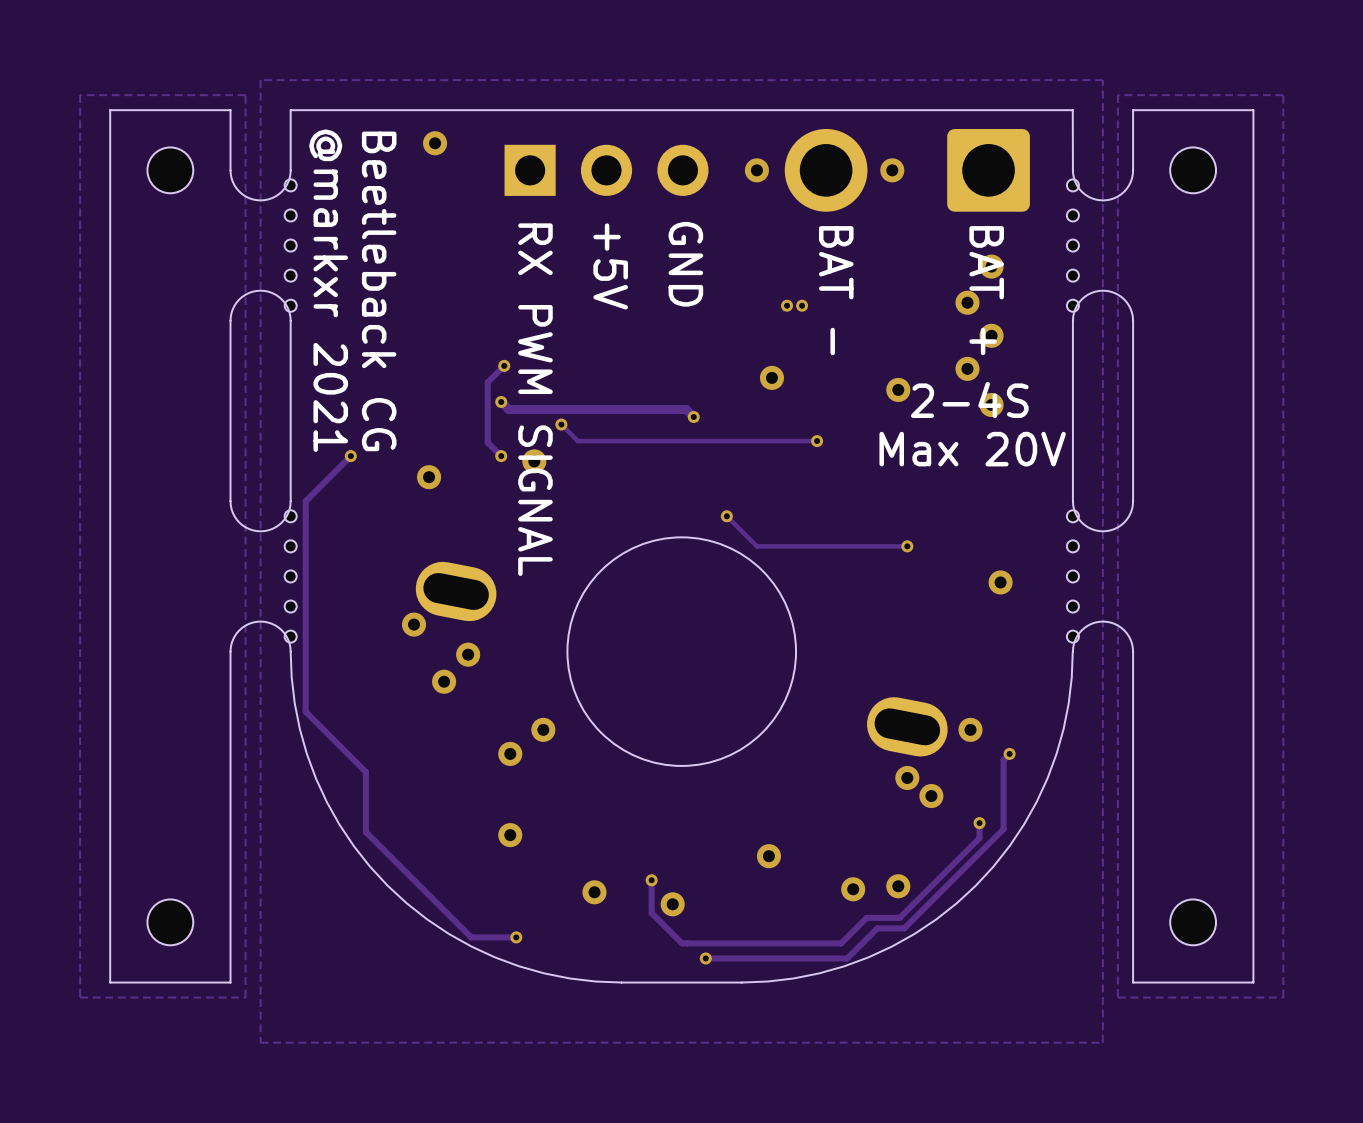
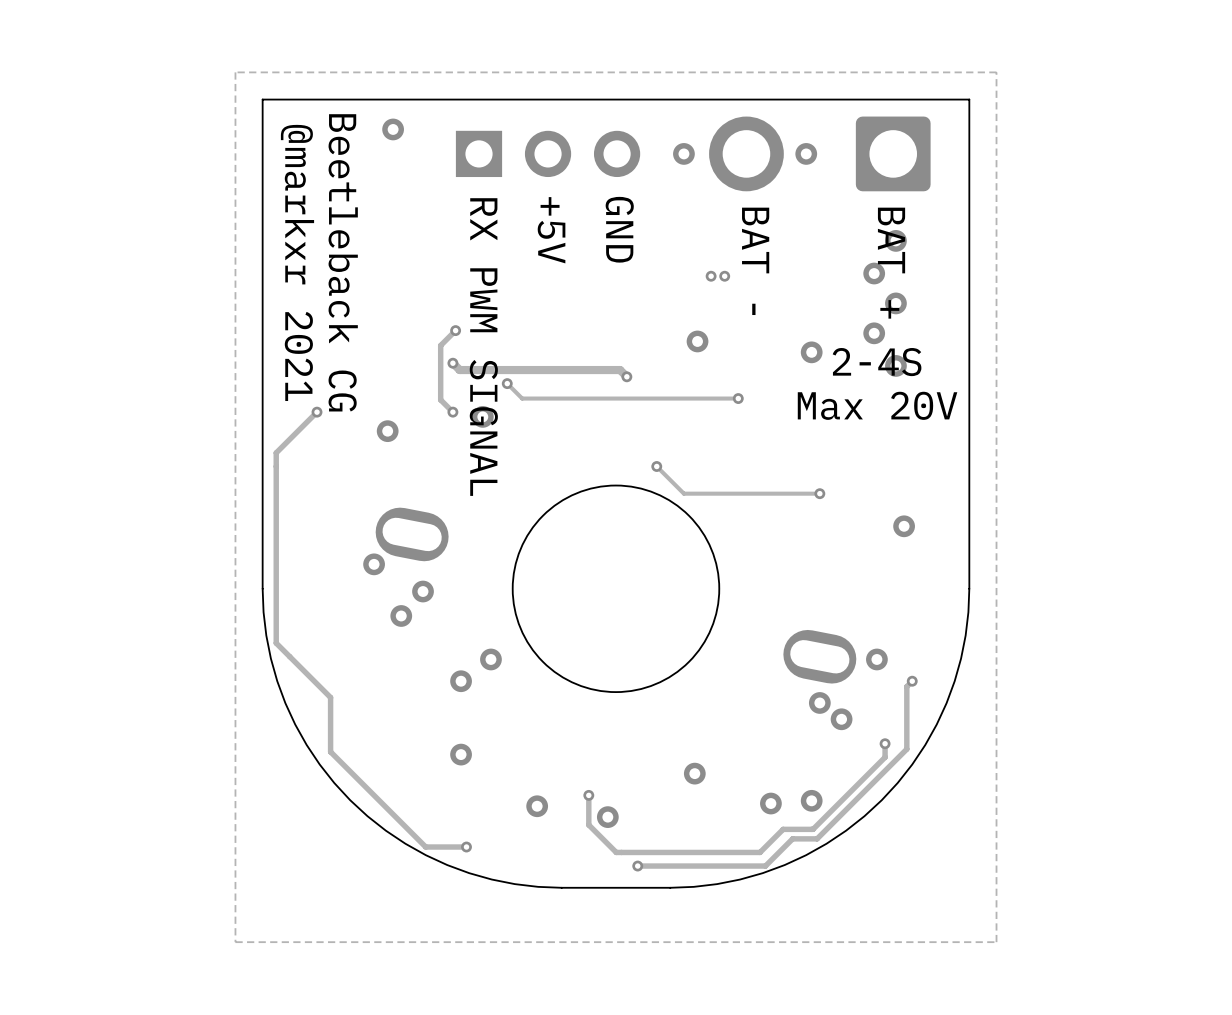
zone outline: (245, 95) (245, 997) (80, 997) (80, 95) (245, 95) -> none
zone outline: (1283, 95) (1117, 95) (1117, 997) (1283, 997) (1283, 95) -> none
board edge: (1072, 110) (1073, 178) (1079, 188) (1084, 194) (1091, 198) (1103, 200) (1114, 198) (1121, 194) (1126, 188) (1132, 178) (1133, 110) (1253, 110) (1253, 982) (1133, 982) (1132, 647) (1129, 636) (1121, 627) (1110, 622) (1099, 621) (1087, 625) (1081, 630) (1075, 640) (1072, 651) -> (969, 99) (969, 588)
part: (170, 170) -> none
board edge: (290, 170) (288, 181) (278, 194) (268, 199) (252, 199) (239, 191) (231, 178) (230, 110) (110, 110) (110, 982) (230, 982) (230, 647) (234, 636) (242, 627) (252, 622) (264, 621) (275, 625) (281, 630) (288, 640) (290, 651) -> (262, 153) (262, 289)
part: (1193, 170) -> none
part: (290, 245) -> none
part: (1072, 245) -> none
board edge: (290, 320) (288, 309) (281, 299) (272, 292) (260, 290) (249, 292) (239, 299) (232, 309) (230, 320) (231, 509) (236, 519) (242, 525) (252, 530) (264, 531) (275, 527) (281, 522) (288, 512) (290, 501) -> (262, 588) (262, 452)
board edge: (1133, 320) (1132, 505) (1129, 516) (1121, 525) (1110, 530) (1099, 531) (1087, 527) (1081, 522) (1075, 512) (1073, 505) (1073, 316) (1075, 309) (1081, 299) (1091, 292) (1103, 290) (1114, 292) (1124, 299) (1130, 309) (1133, 320) -> none
part: (290, 576) -> none
part: (1072, 576) -> none
part: (170, 922) -> none
part: (1193, 922) -> none

